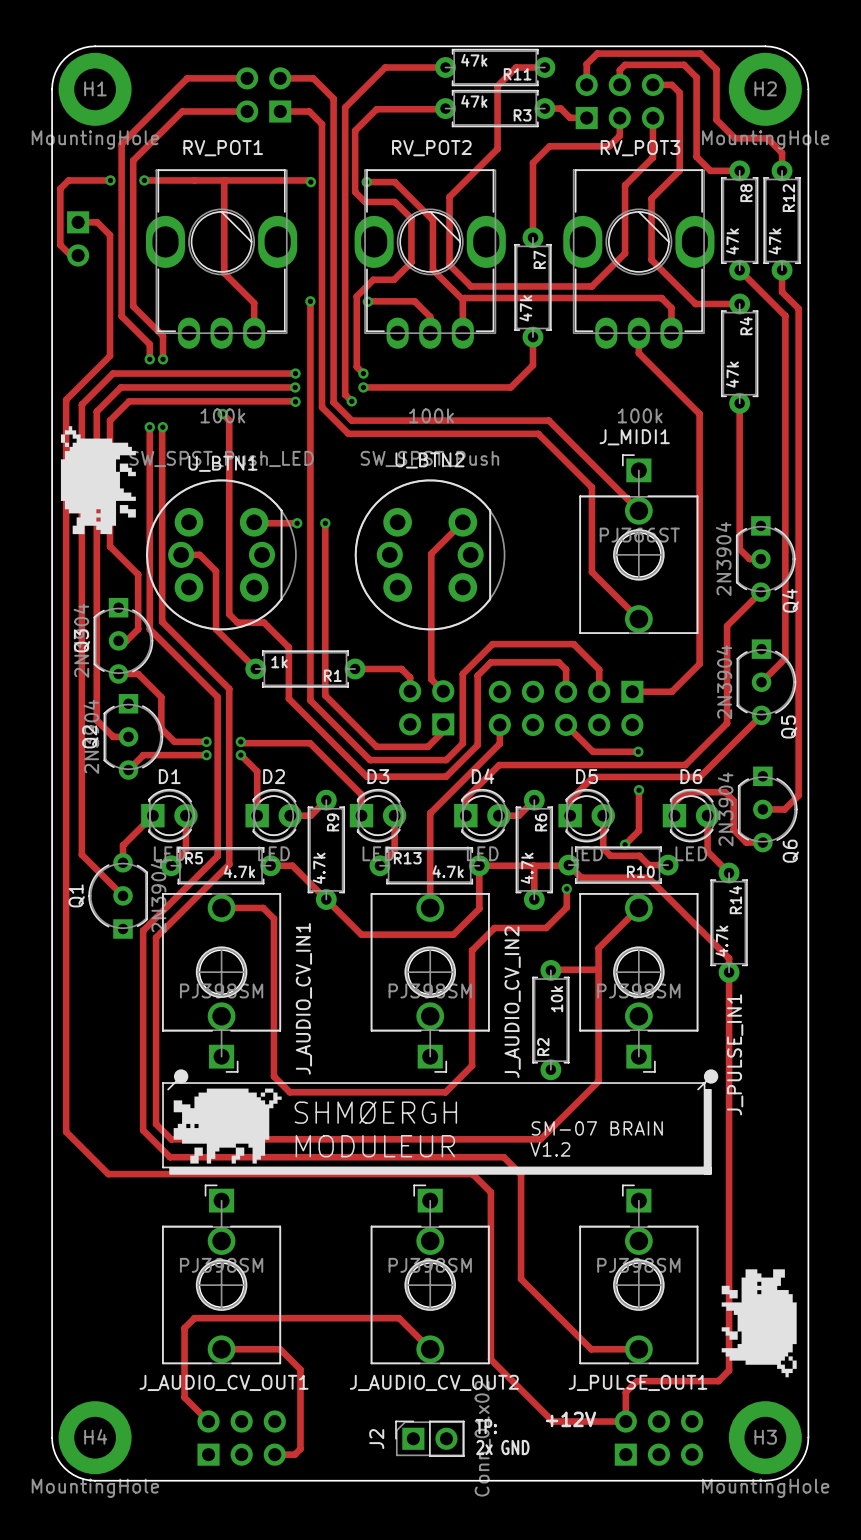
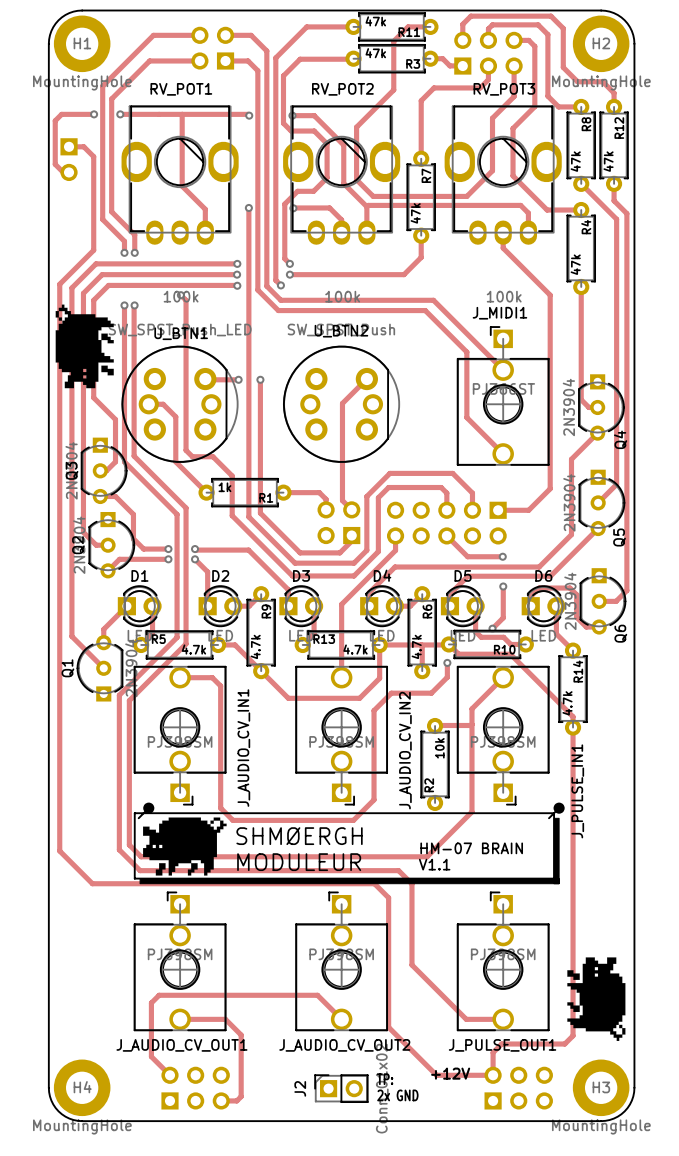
text: SM-07 BRAIN (597, 1128) -> HM-07 BRAIN (471, 848)
text: V1.2 (550, 1149) -> V1.1 (434, 864)

